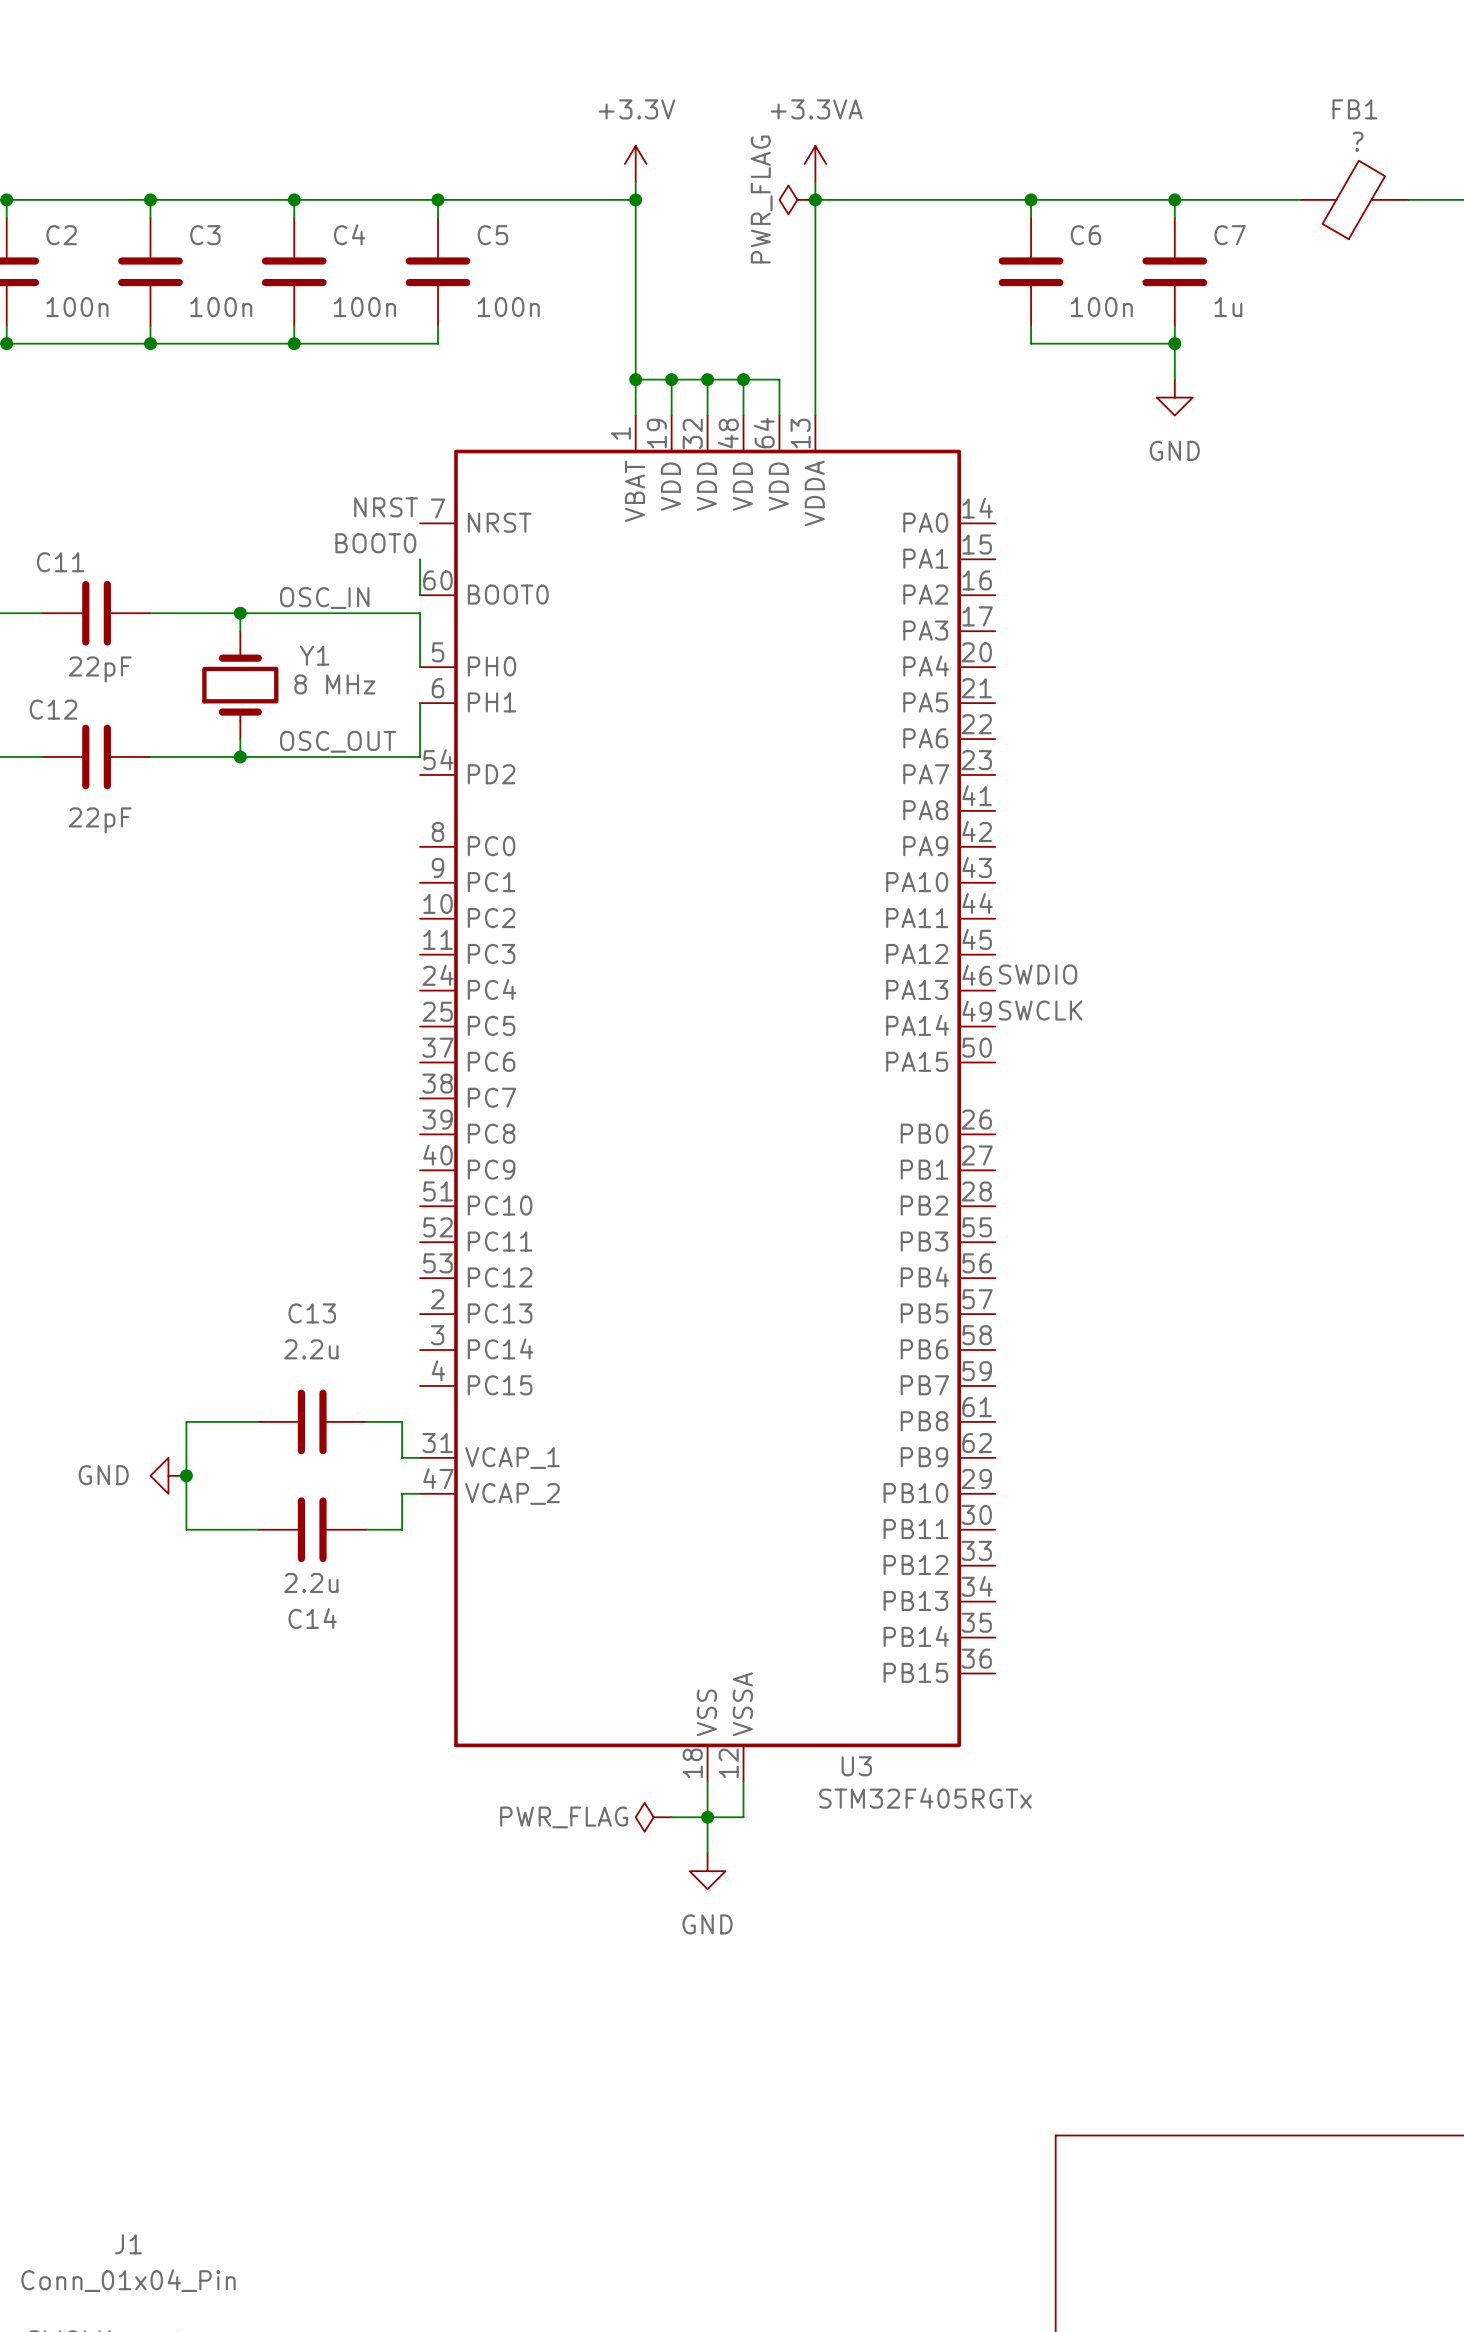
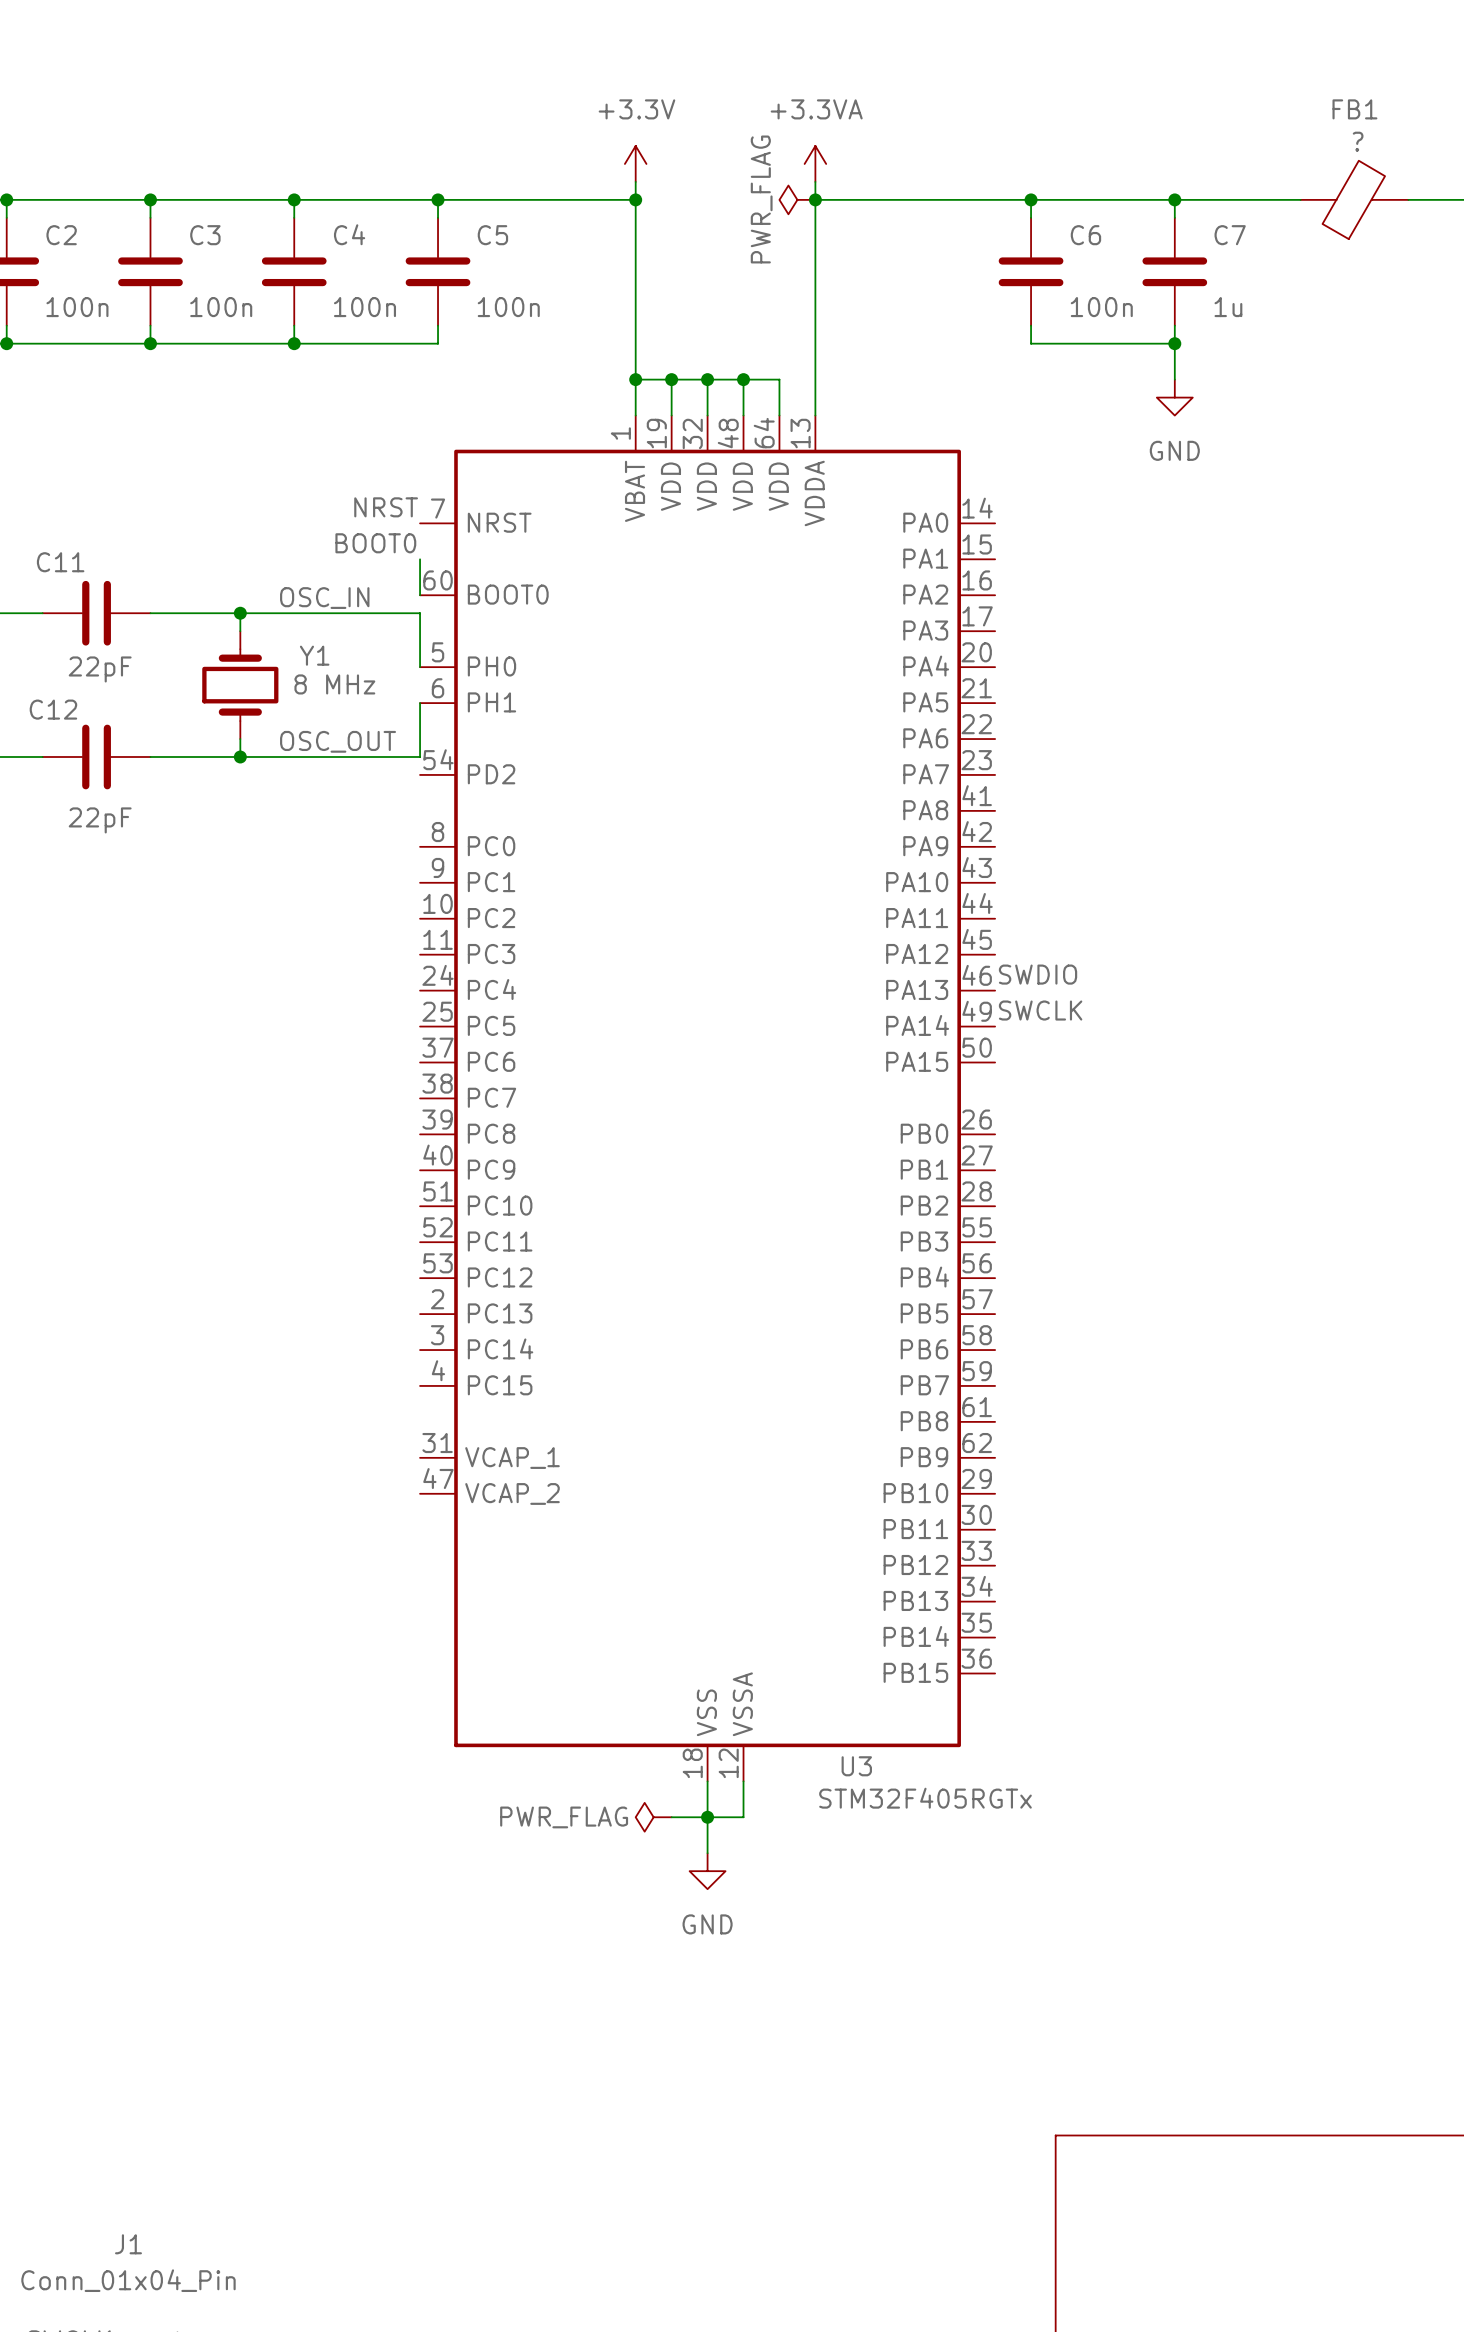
wire: (258, 1421) (186, 1421) (186, 1529) (258, 1529) -> none
C13: 2.2u (312, 1421) -> none
wire: (366, 1421) (402, 1421) (402, 1457) (420, 1457) -> none
power symbol: GND (168, 1475) -> none
junction: (186, 1475) -> none
wire: (420, 1493) (402, 1493) (402, 1529) (366, 1529) -> none
C14: 2.2u (312, 1529) -> none

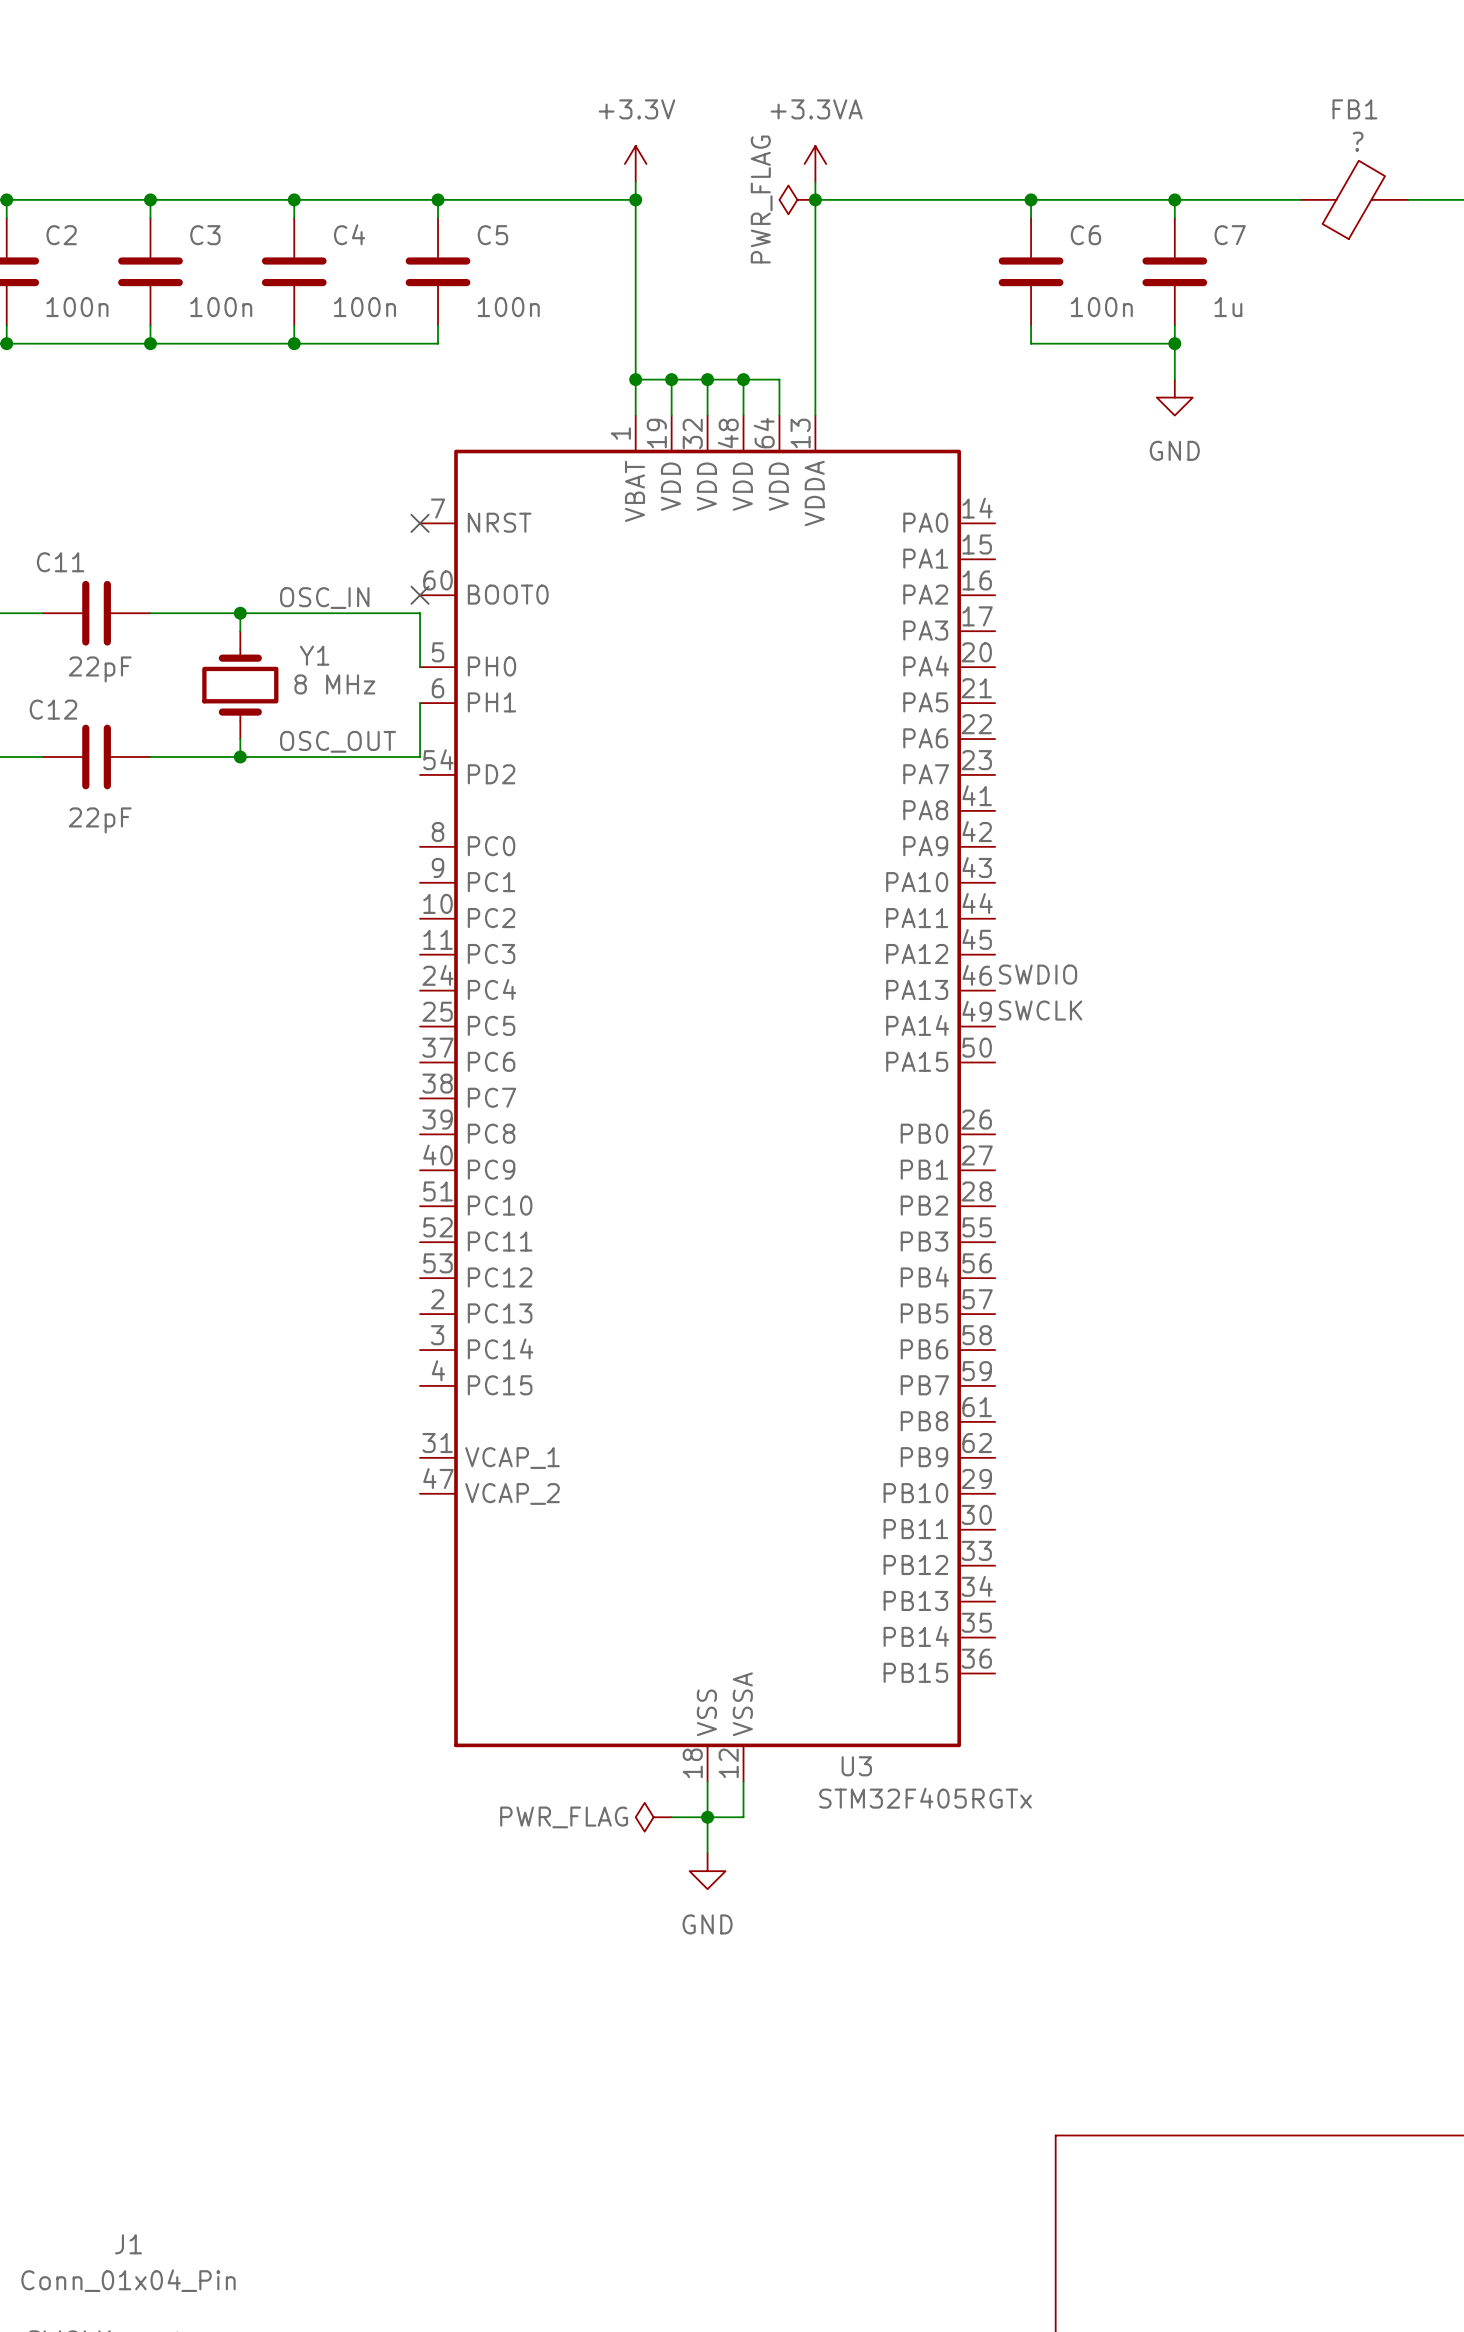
label: NRST (386, 507) -> none
no-connect mark: none -> (420, 523)
label: BOOT0 (375, 543) -> none
wire: (420, 559) (420, 595) -> none
no-connect mark: none -> (420, 595)

